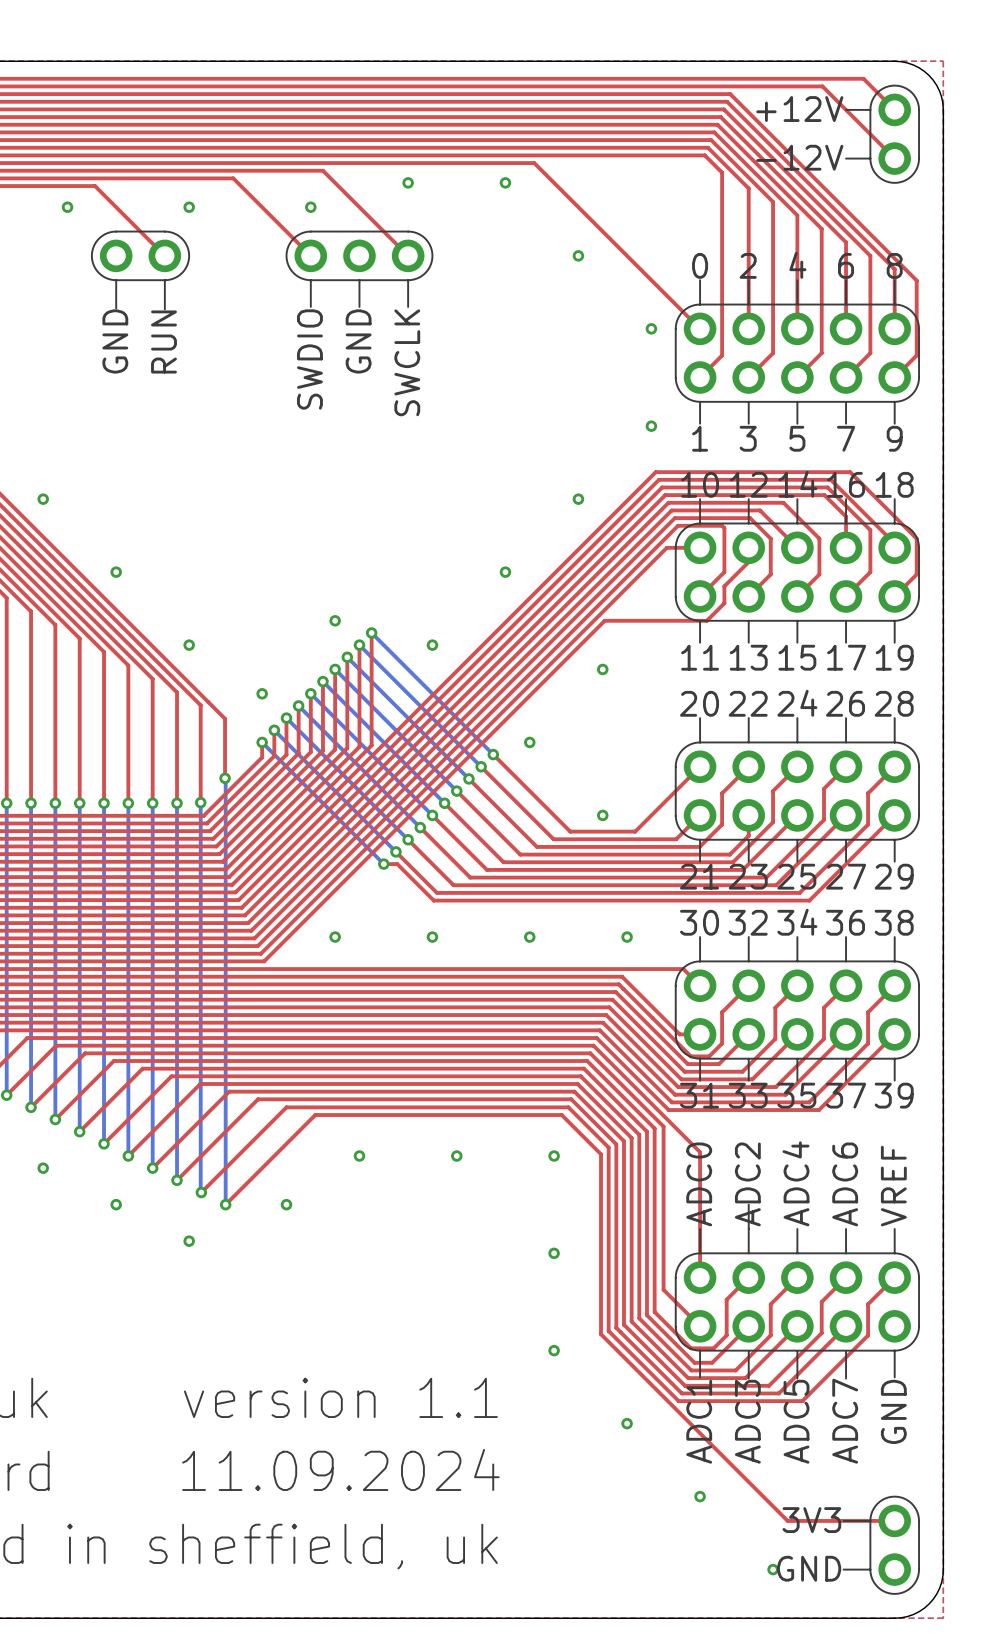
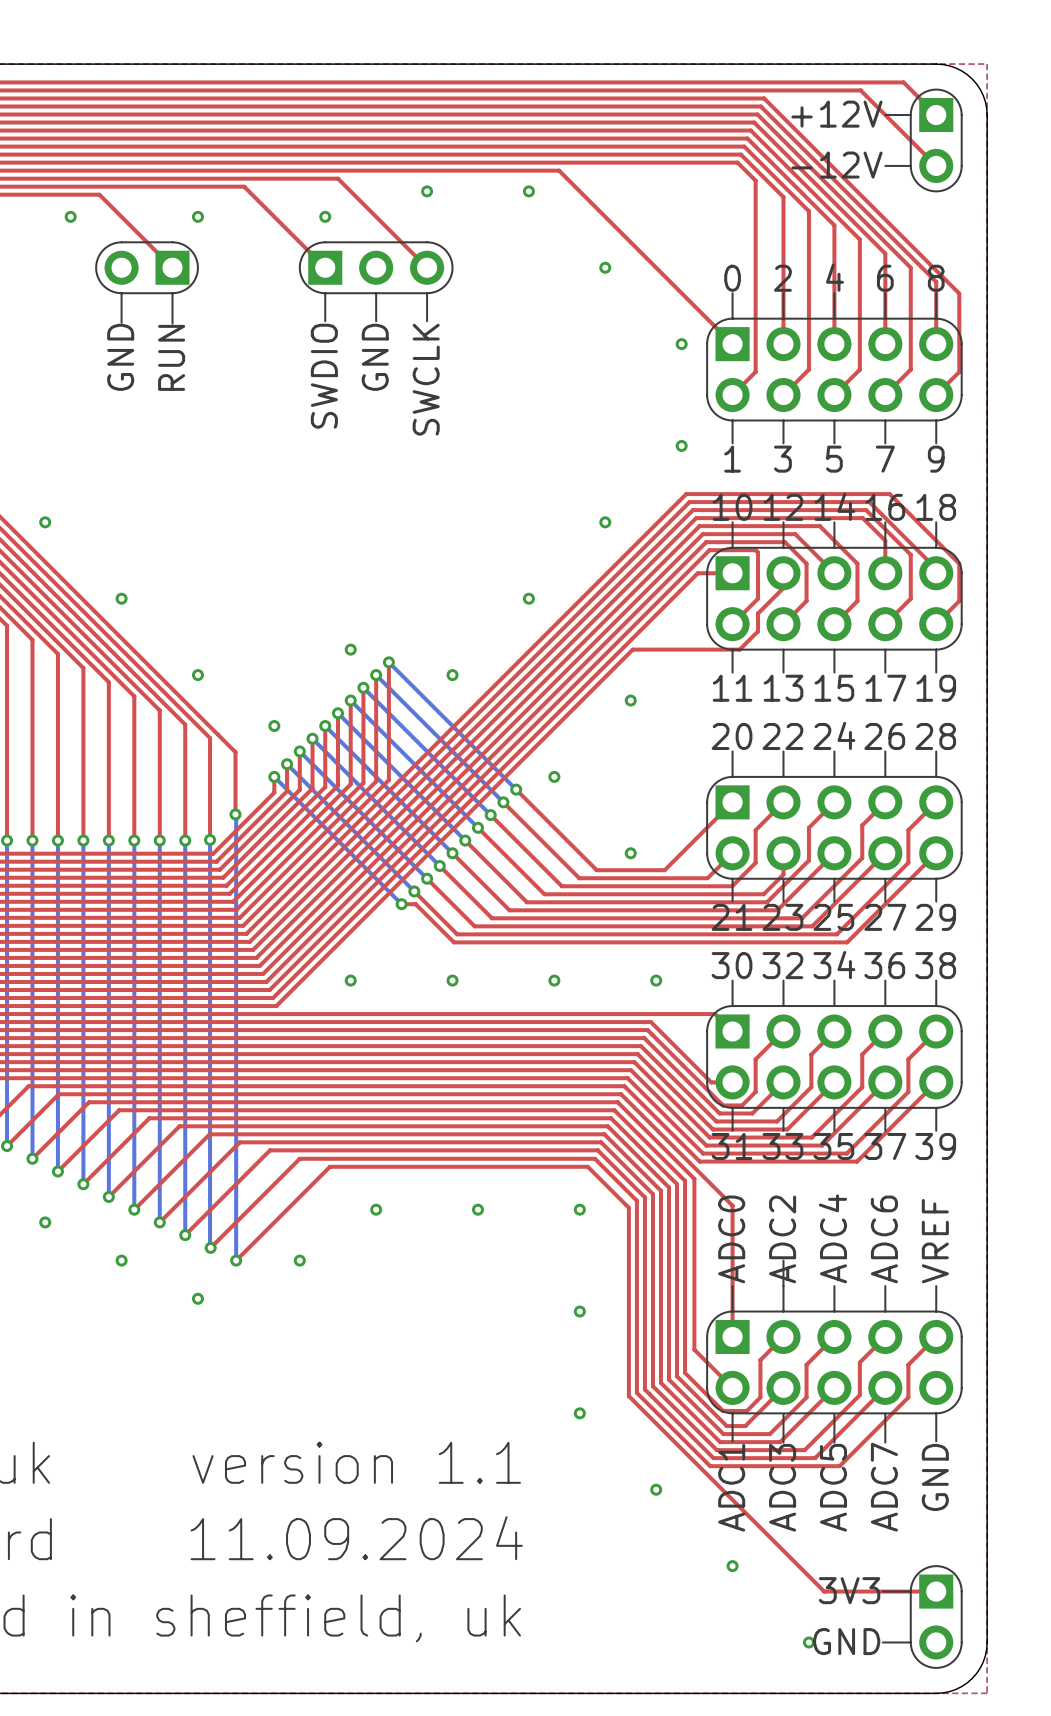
part footprint: [869, 84, 920, 184] -> [909, 88, 963, 193]
part footprint: [90, 230, 191, 282] -> [95, 241, 199, 295]
part footprint: [285, 230, 434, 282] -> [298, 241, 454, 295]
part footprint: [674, 303, 920, 403] -> [706, 317, 963, 422]
part footprint: [674, 522, 920, 622] -> [706, 546, 963, 651]
part footprint: [674, 741, 920, 841] -> [706, 775, 963, 880]
part footprint: [674, 960, 920, 1060] -> [706, 1005, 963, 1109]
part footprint: [674, 1252, 920, 1352] -> [706, 1310, 963, 1415]
part footprint: [869, 1495, 920, 1595] -> [909, 1565, 963, 1669]

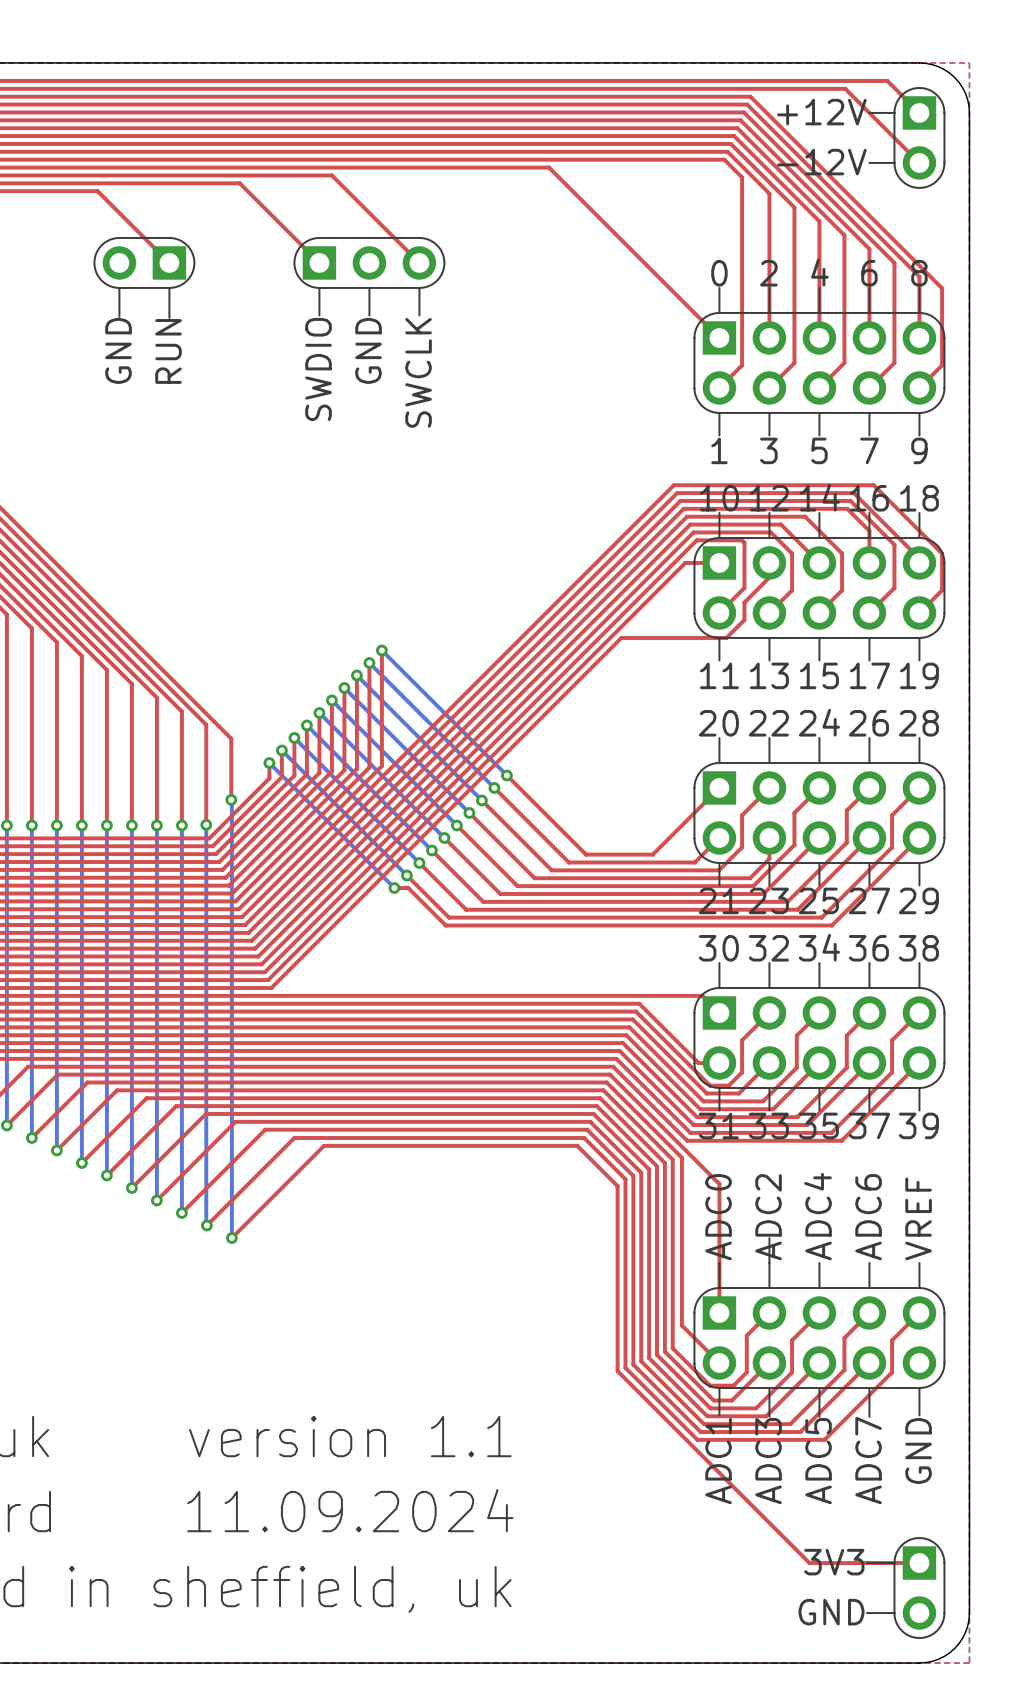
via: (427, 191) -> none
via: (528, 191) -> none
via: (70, 216) -> none
via: (197, 216) -> none
via: (325, 216) -> none
via: (605, 267) -> none
via: (681, 344) -> none
via: (681, 445) -> none
via: (45, 522) -> none
via: (605, 522) -> none
via: (121, 598) -> none
via: (528, 598) -> none
via: (350, 649) -> none
via: (197, 675) -> none
via: (452, 675) -> none
via: (630, 700) -> none
via: (274, 726) -> none
via: (554, 776) -> none
via: (630, 853) -> none
via: (350, 980) -> none
via: (452, 980) -> none
via: (554, 980) -> none
via: (656, 980) -> none
via: (376, 1209) -> none
via: (478, 1209) -> none
via: (579, 1209) -> none
via: (45, 1222) -> none
via: (121, 1260) -> none
via: (299, 1260) -> none
via: (197, 1298) -> none
via: (579, 1311) -> none
via: (579, 1413) -> none
via: (656, 1489) -> none
via: (732, 1566) -> none
via: (808, 1642) -> none

